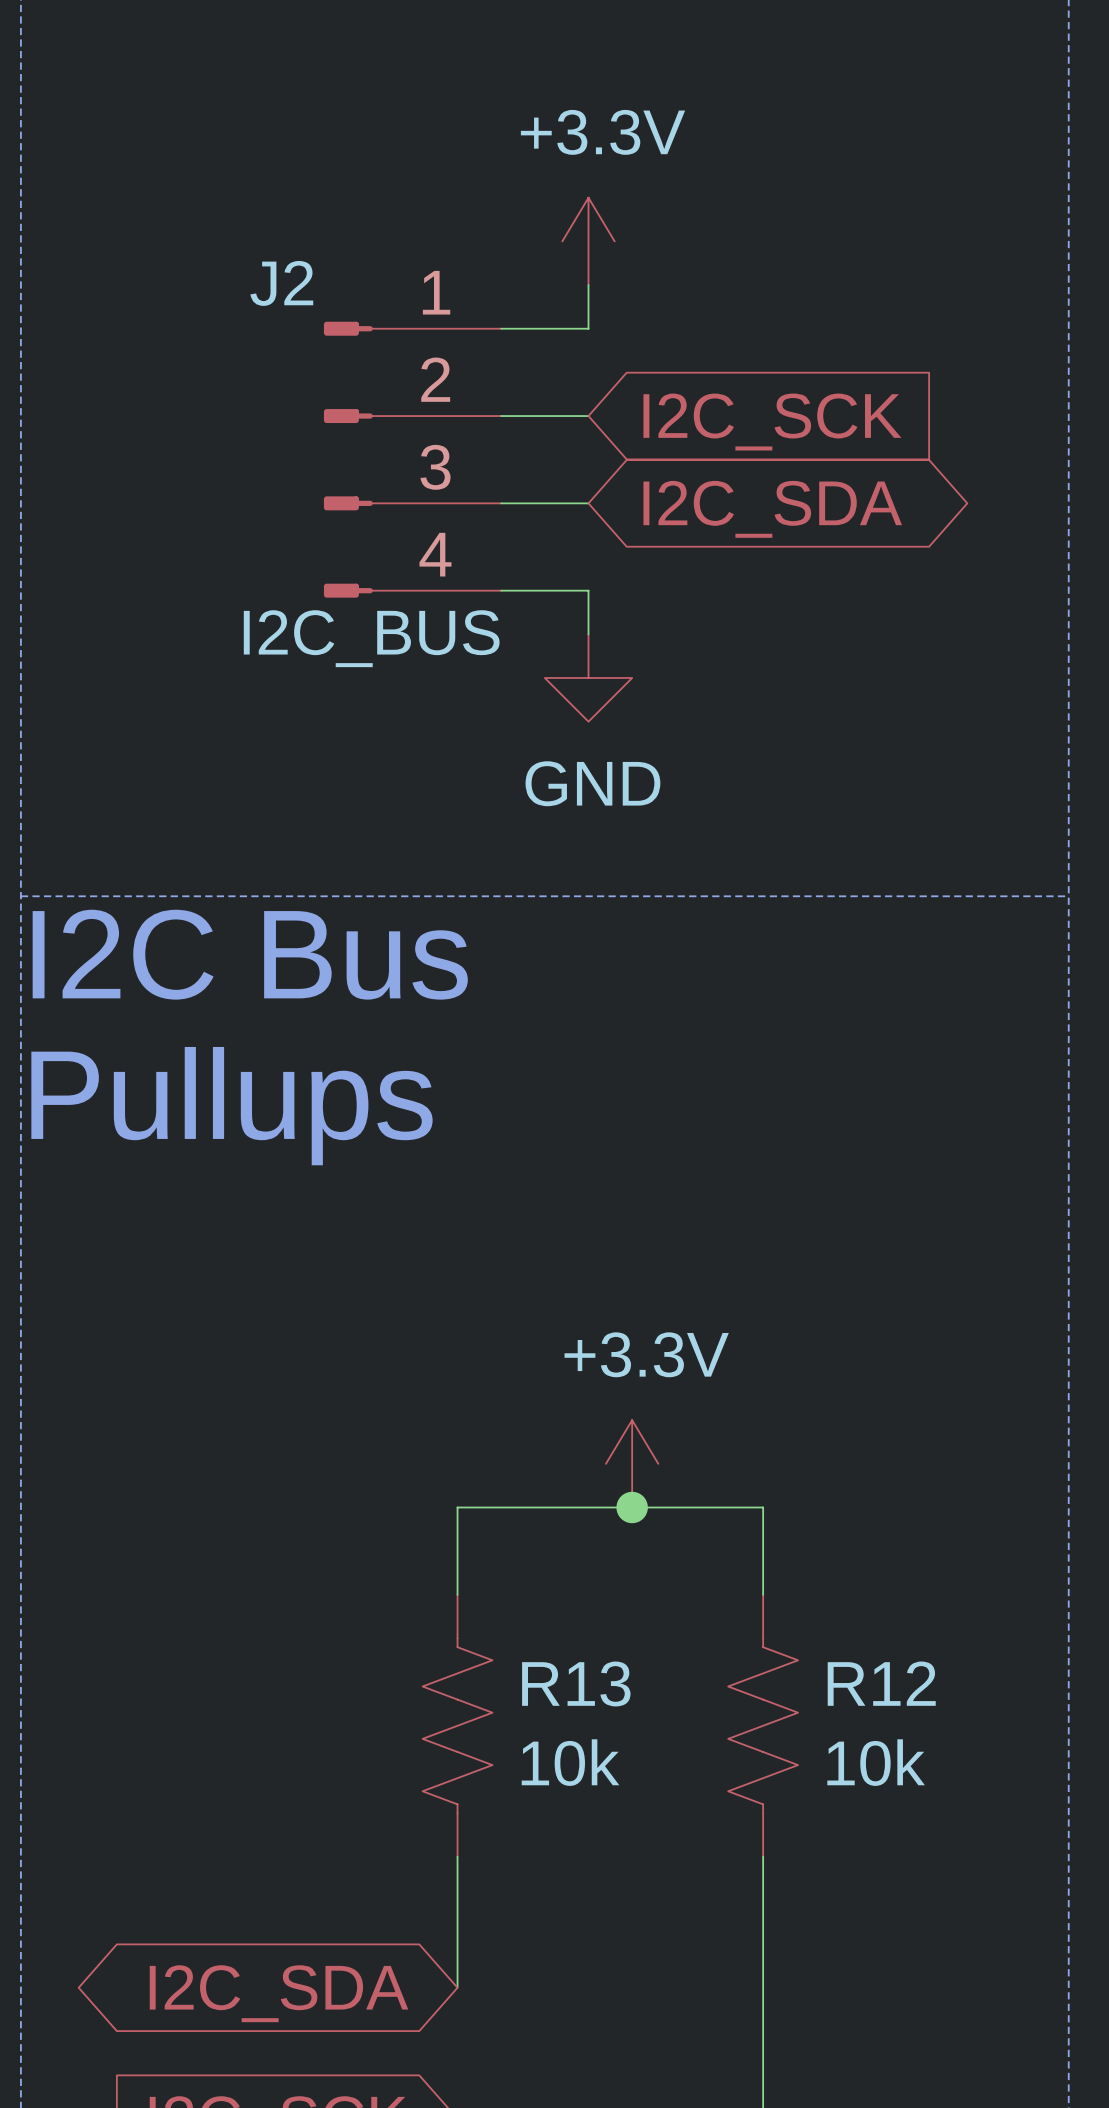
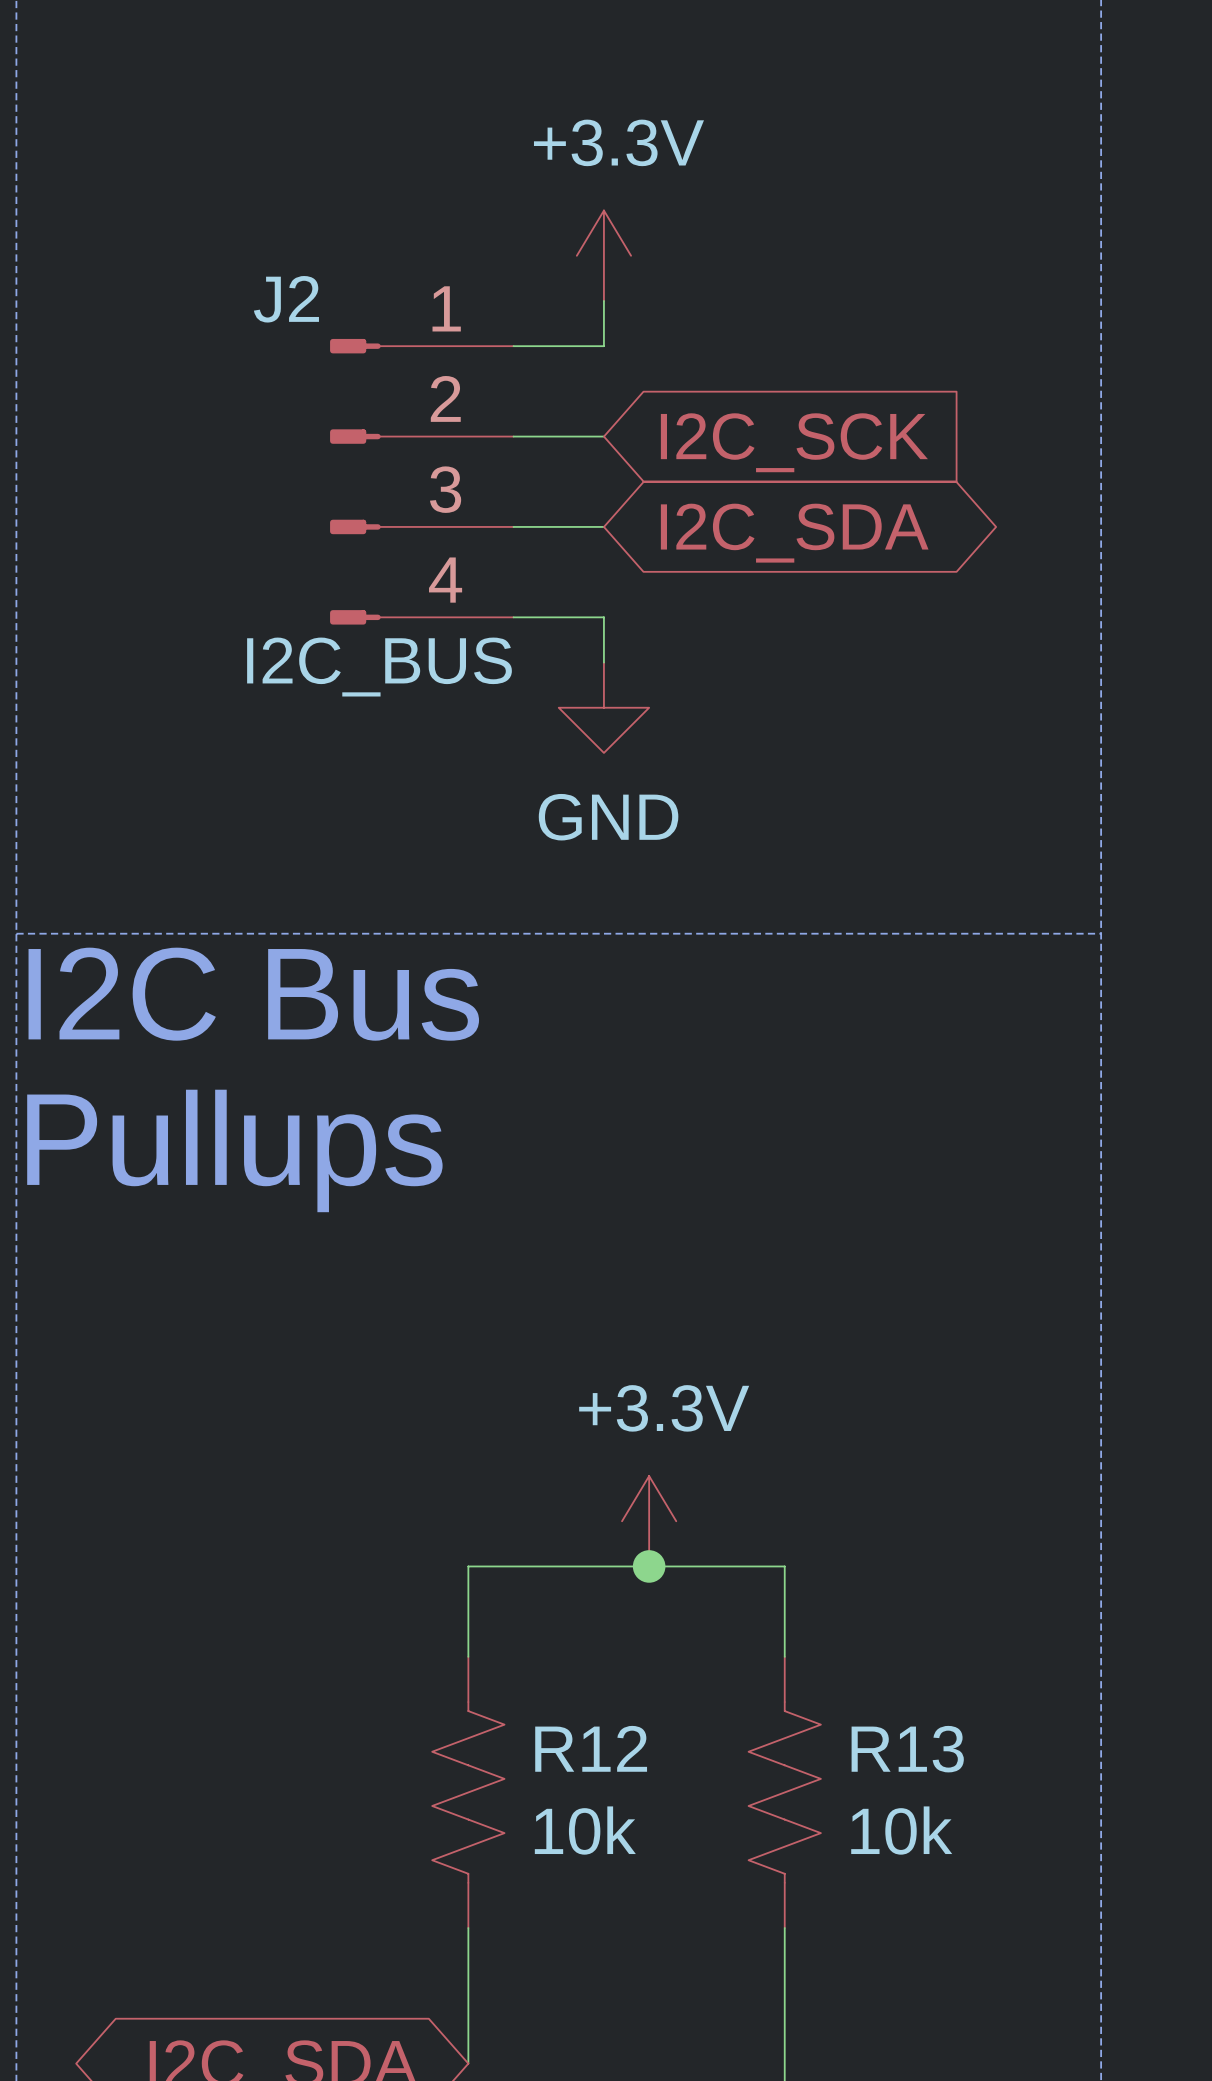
R13 name: R13 (576, 1683) -> R12 (591, 1748)
R12 name: R12 (881, 1683) -> R13 (907, 1749)

